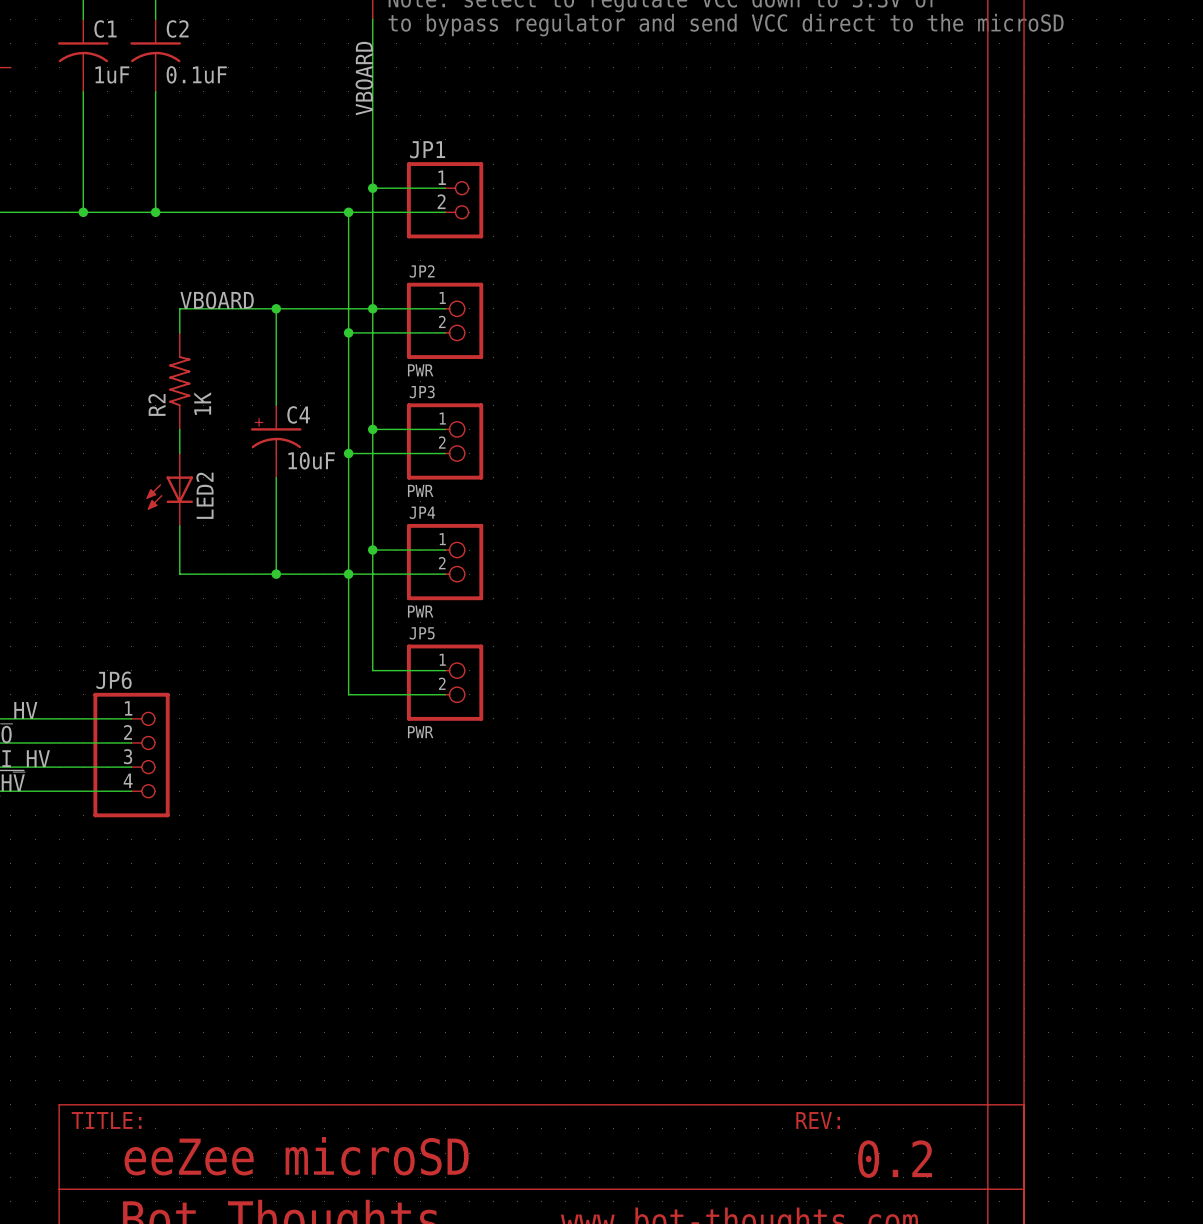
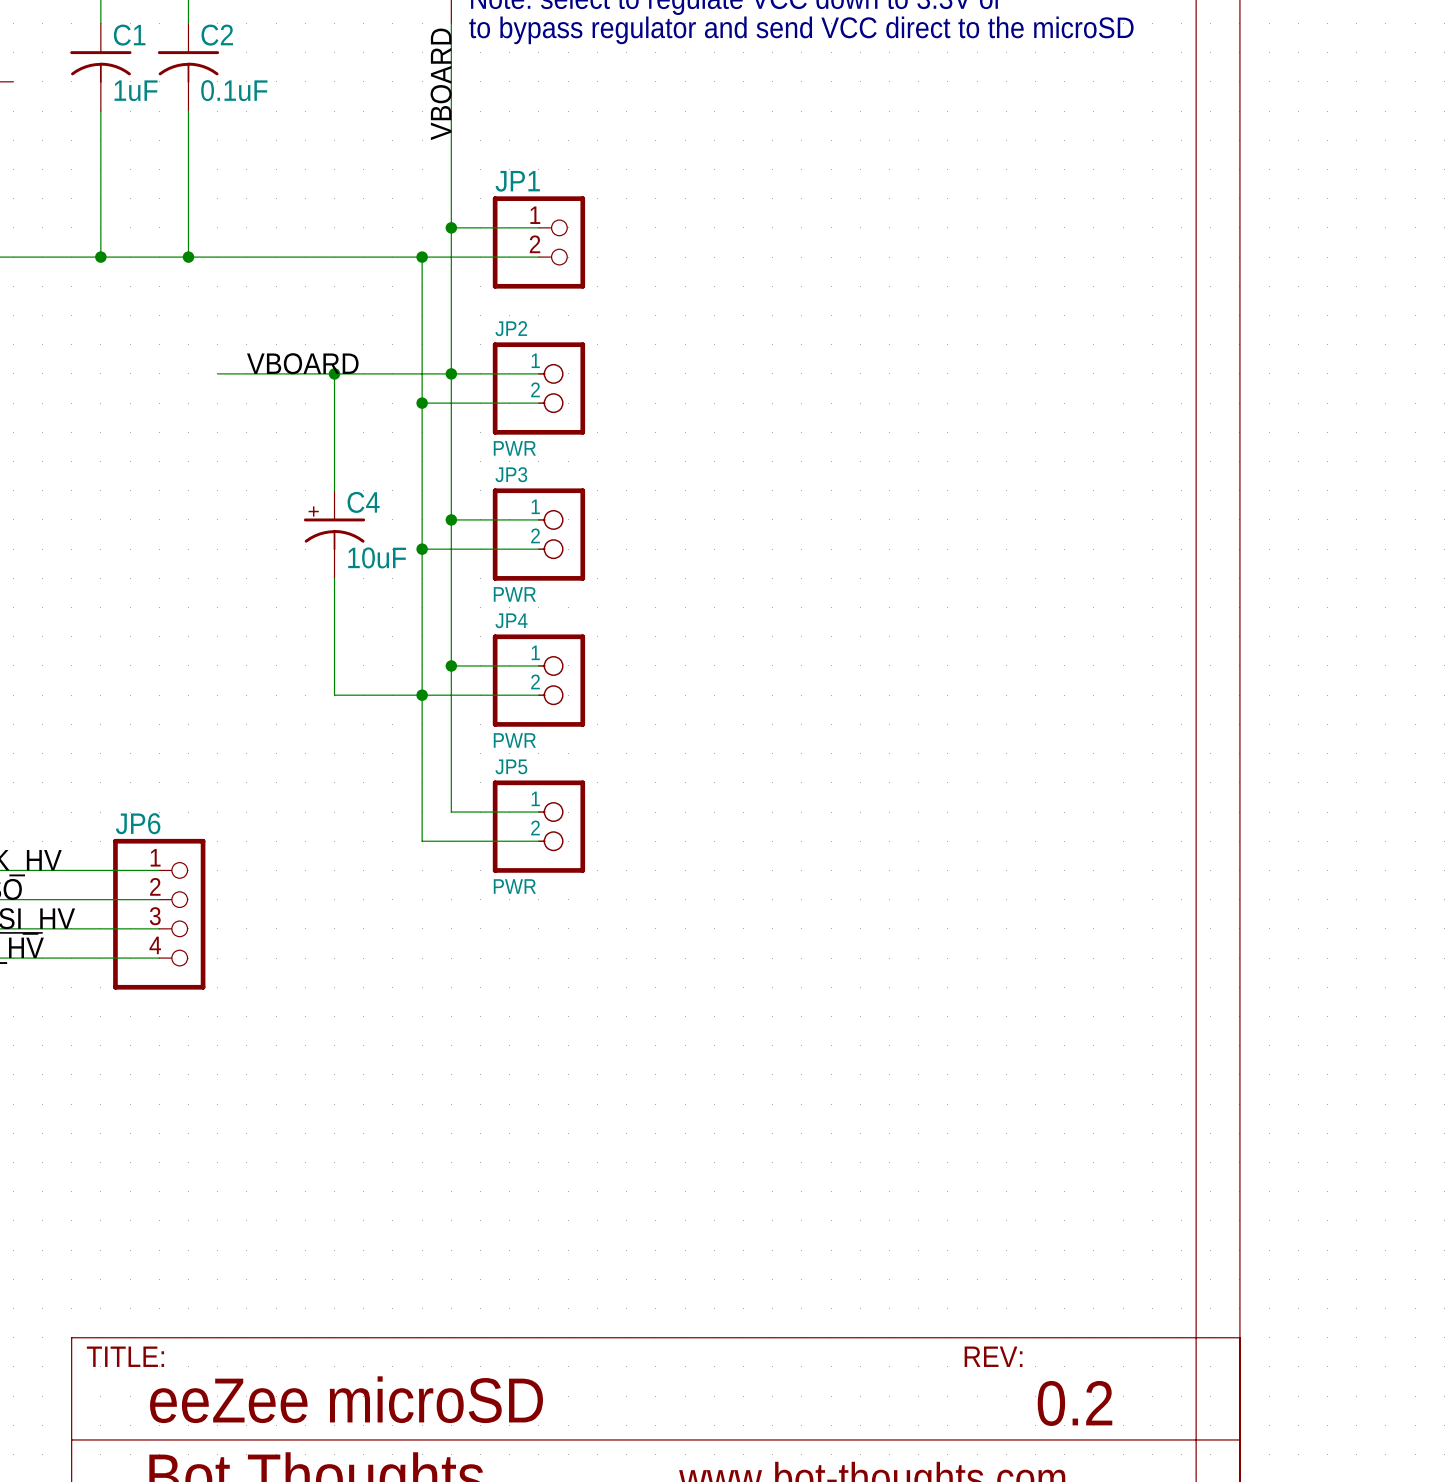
label position: VBOARD (217, 300) -> VBOARD (302, 363)
wire: (179, 308) (179, 332) -> none
R2: 1K (179, 381) -> none
wire: (179, 429) (179, 453) -> none
LED2: (169, 489) -> none
wire: (179, 525) (179, 574) (276, 574) -> none
junction: (276, 574) -> none

